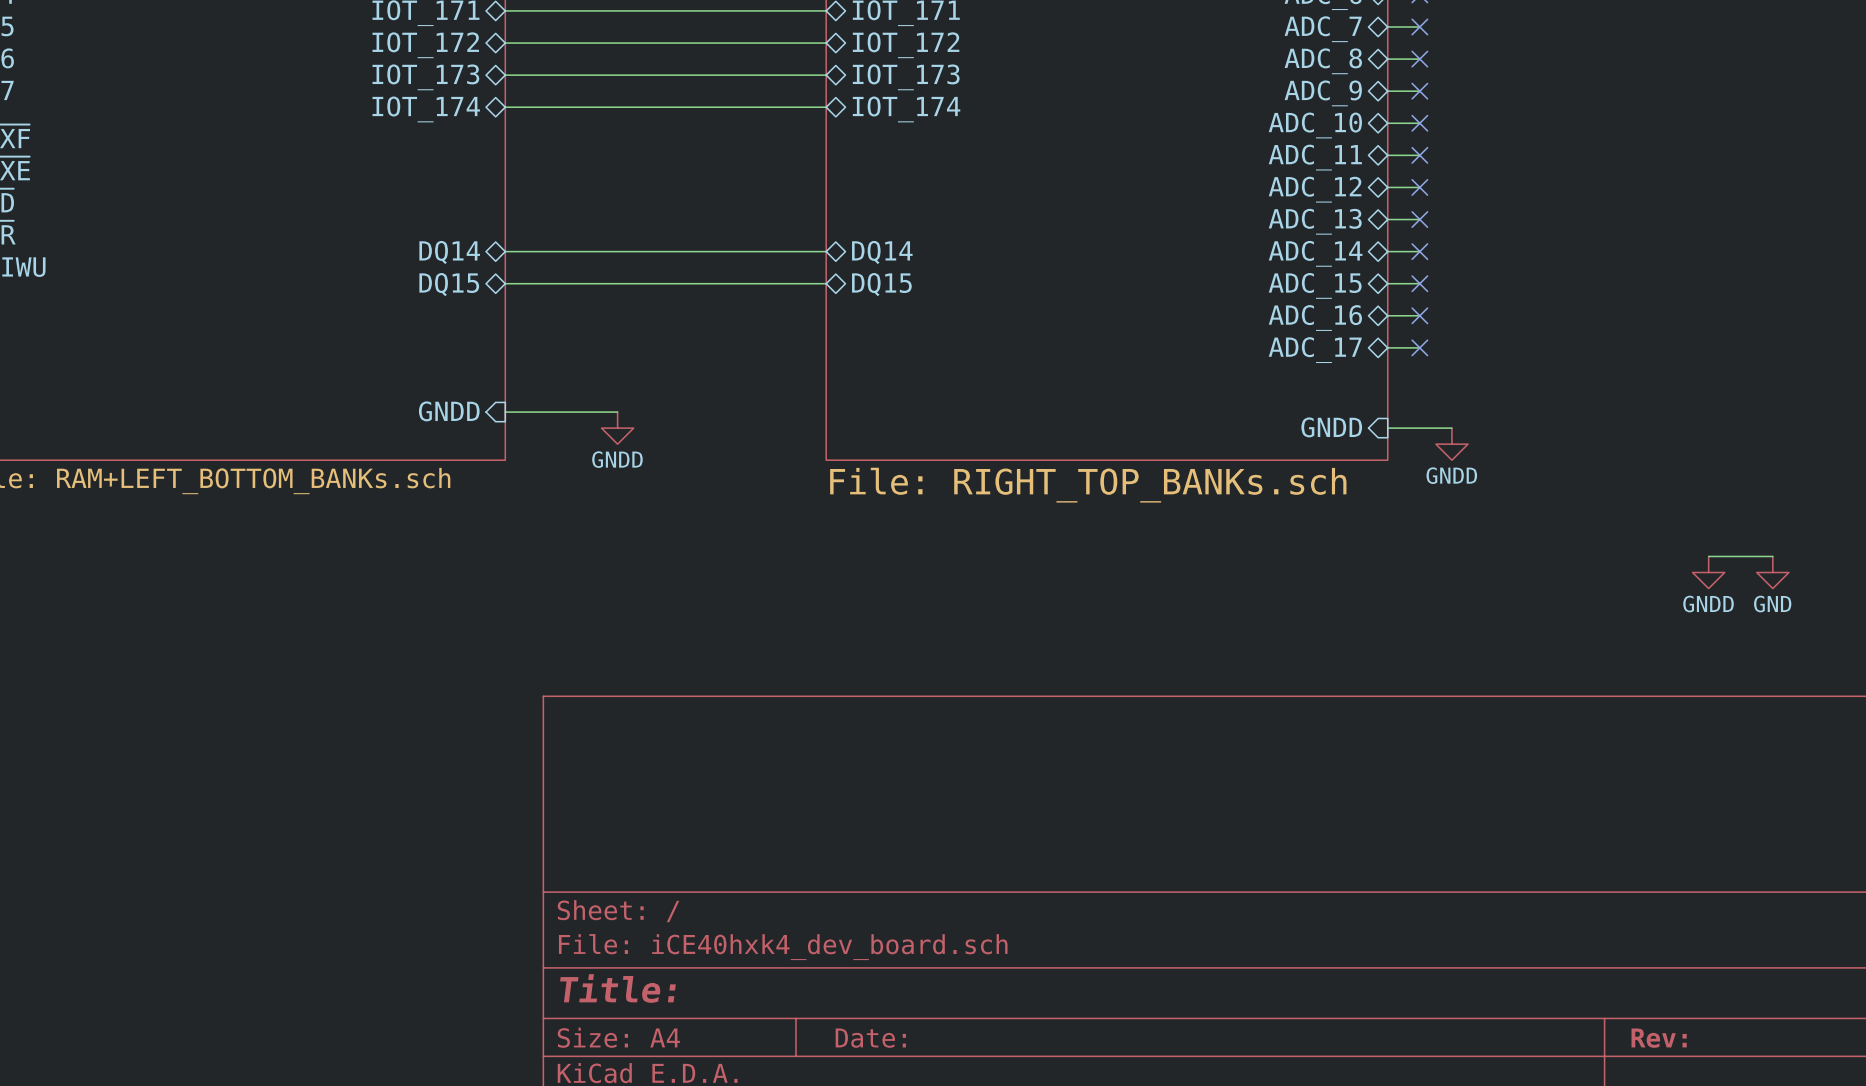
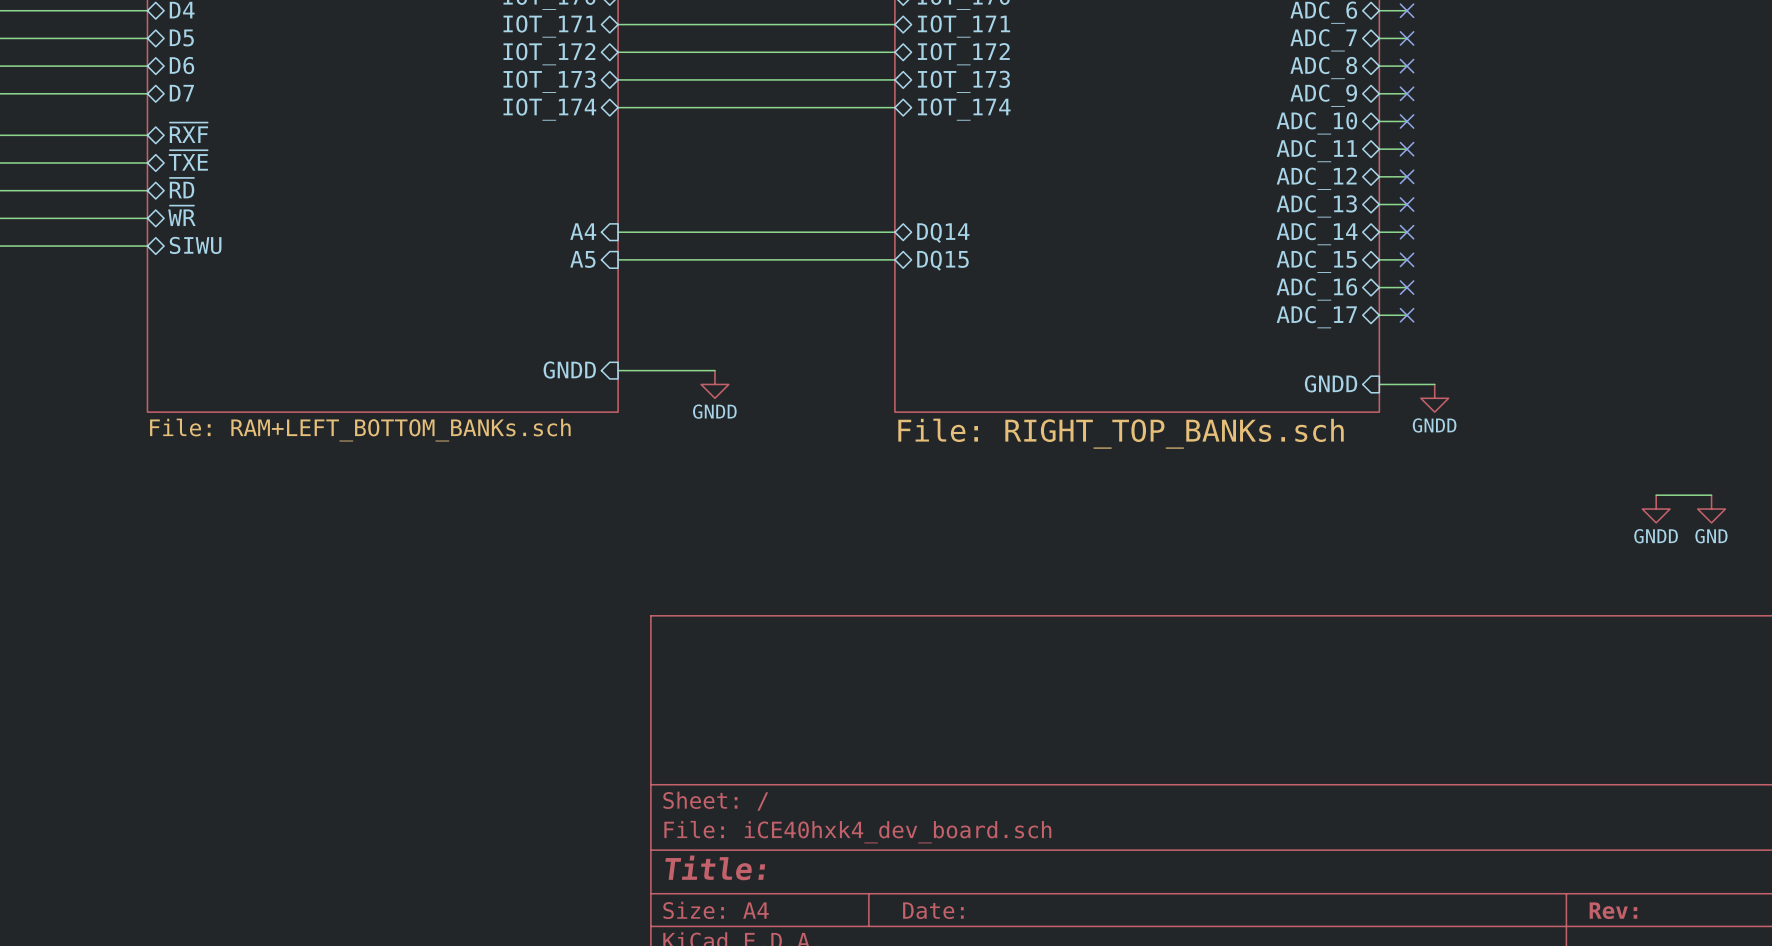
sheet pin shape: bidirectional (449, 252) -> input (583, 231)
sheet pin: DQ14 (449, 252) -> A4 (583, 231)
sheet pin shape: bidirectional (449, 284) -> input (582, 259)
sheet pin: DQ15 (449, 284) -> A5 (582, 259)

